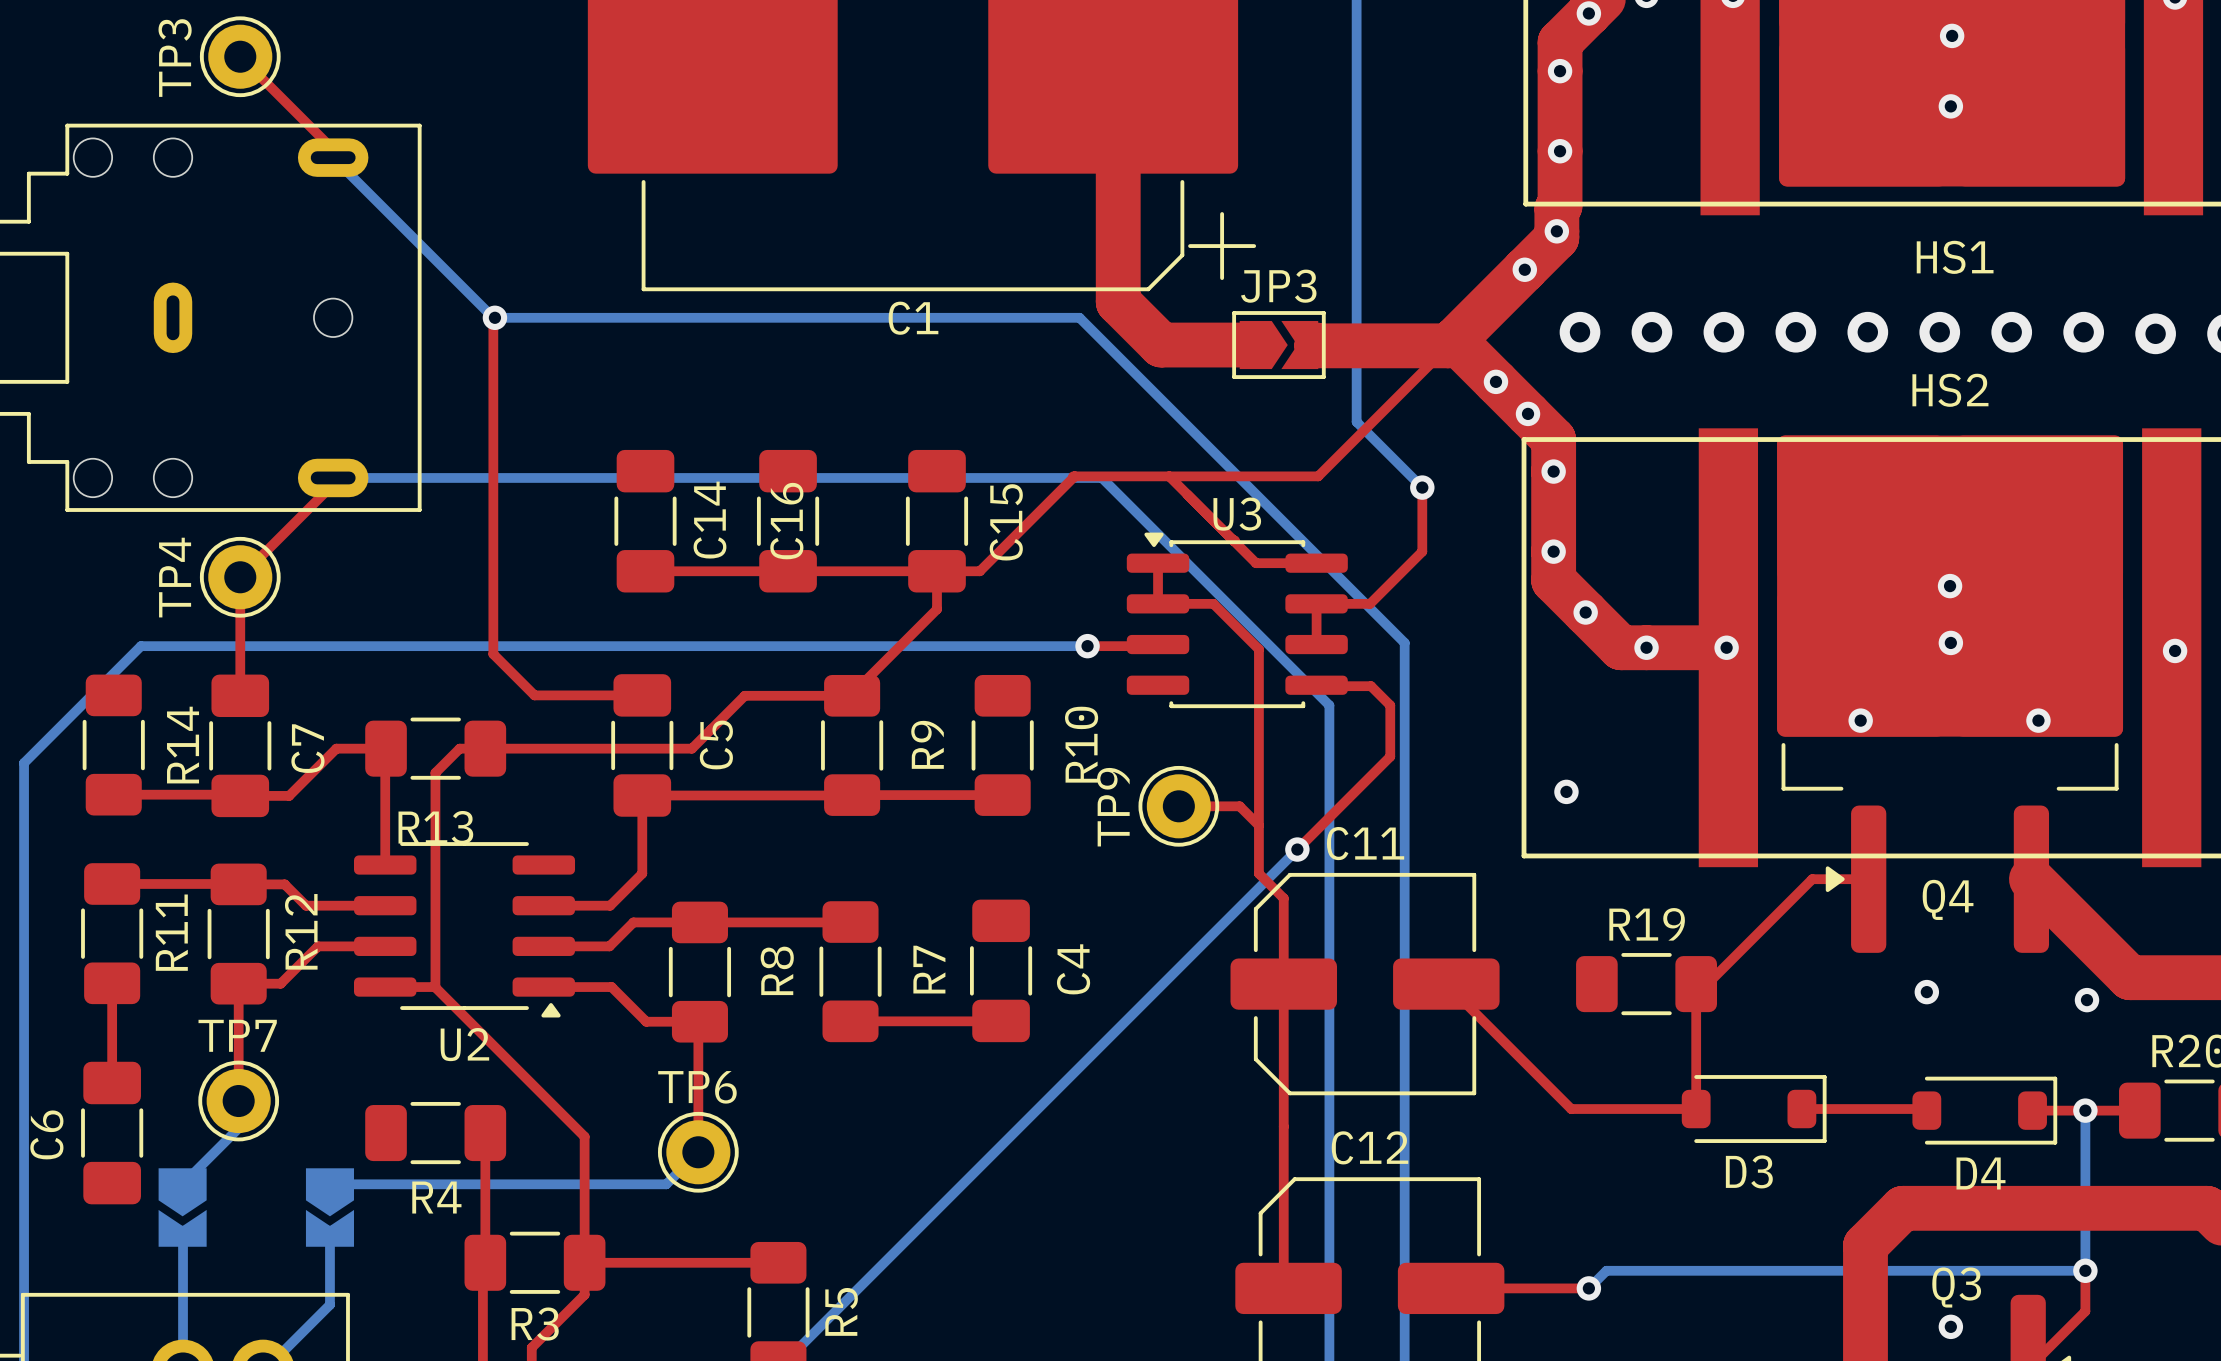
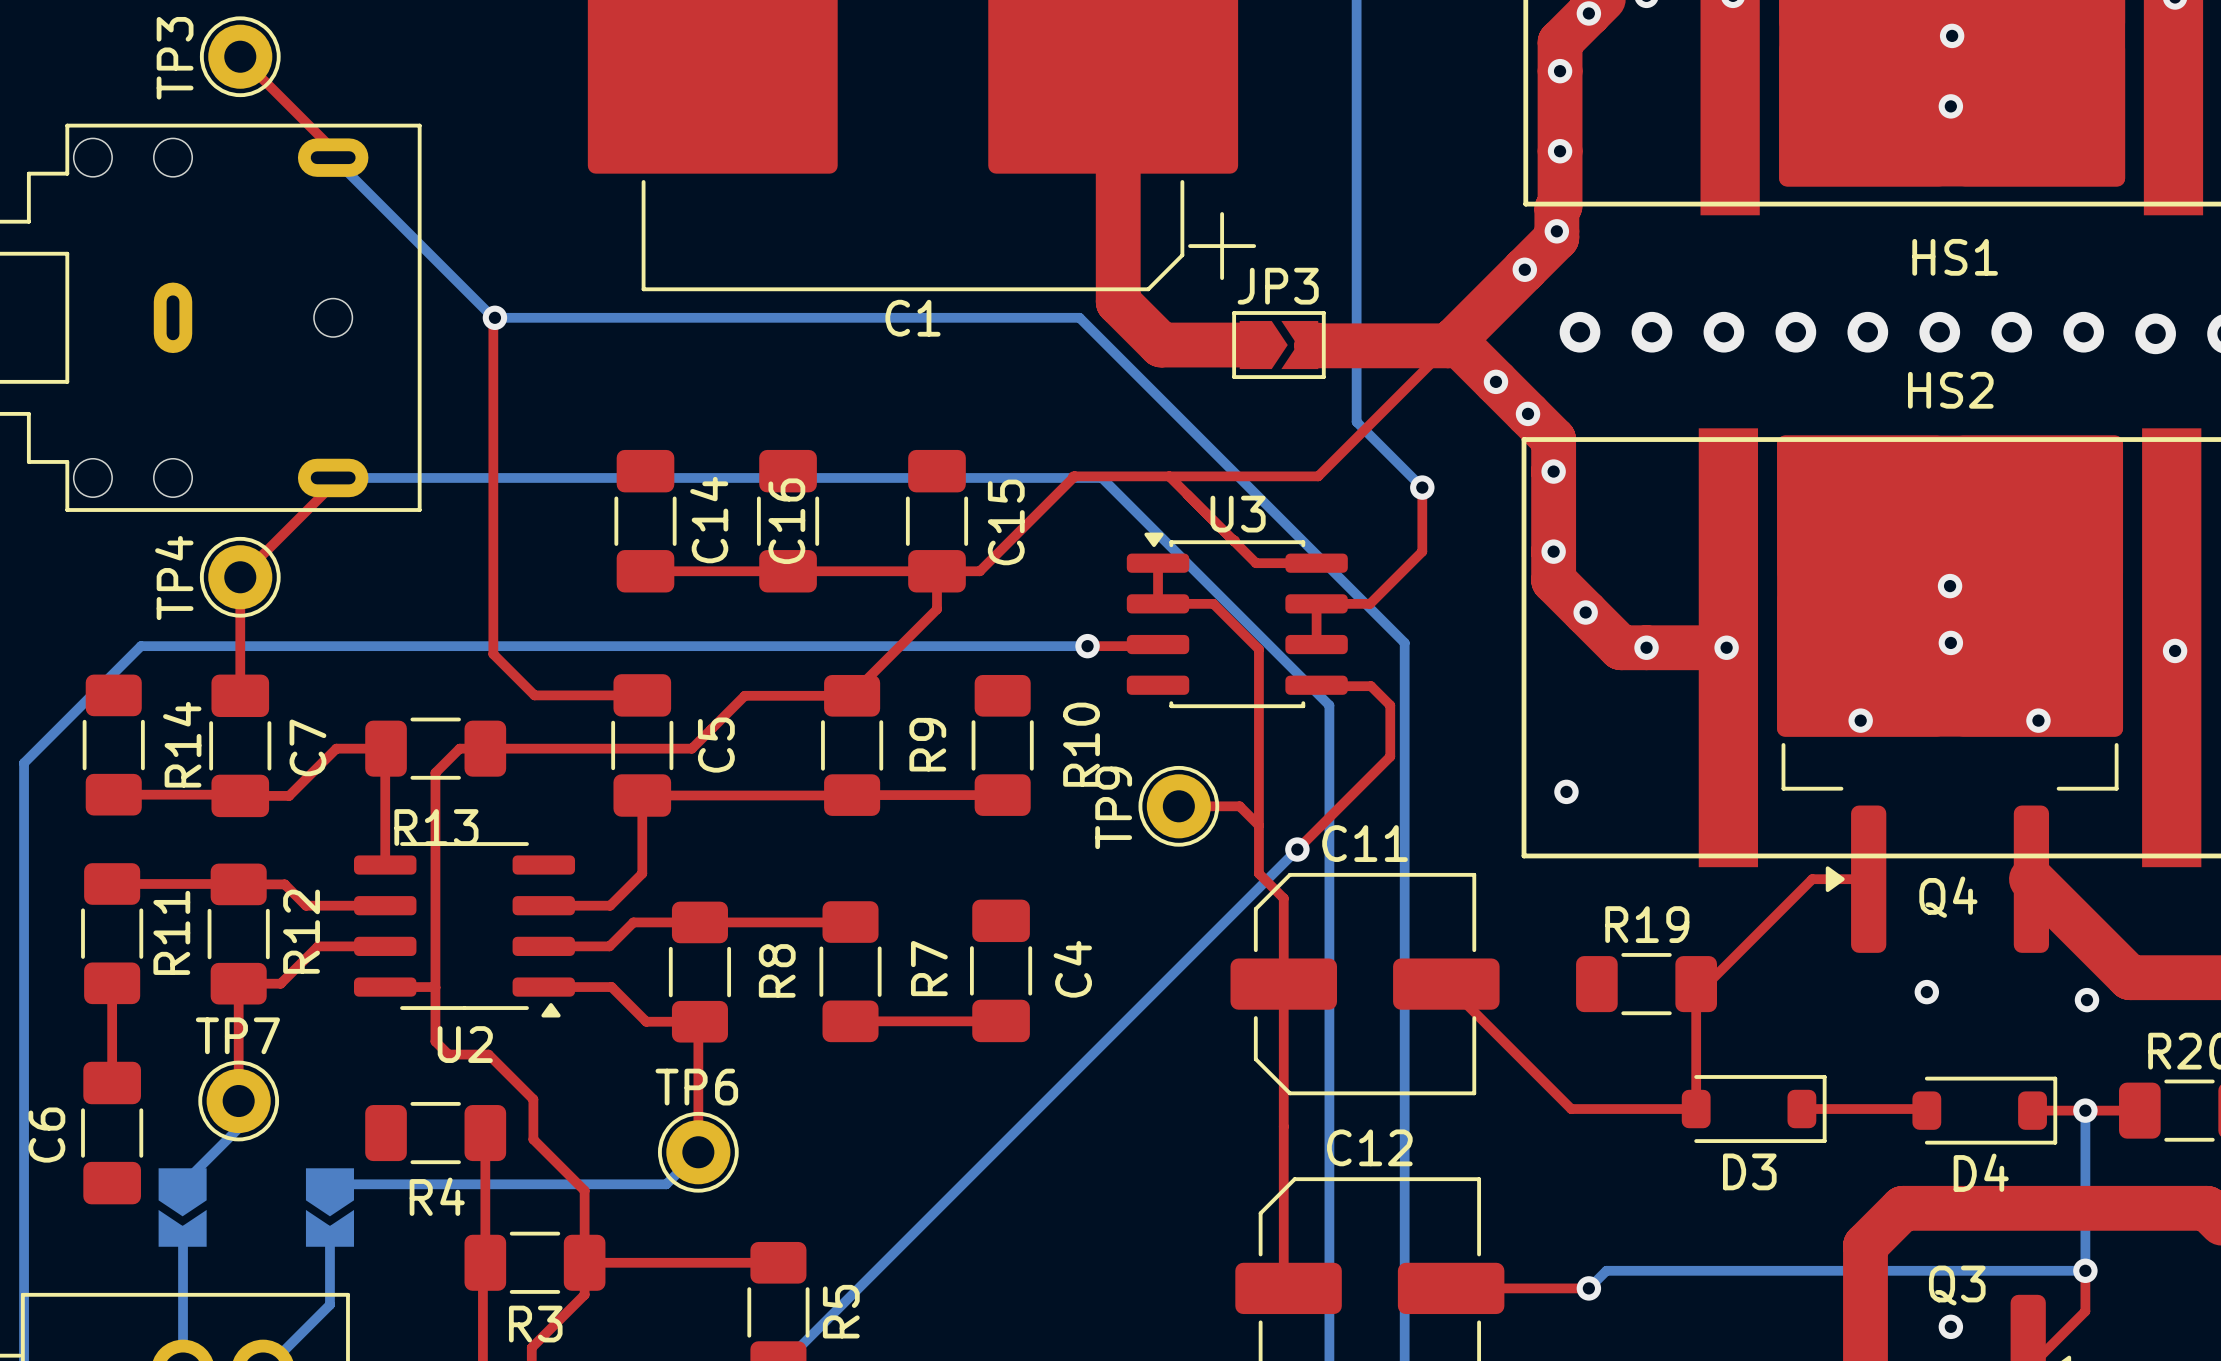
top track: (435, 987) (584, 1136) (584, 1190) -> (435, 987) (435, 1041) (448, 1054) (488, 1054) (533, 1099) (533, 1139) (584, 1190)

